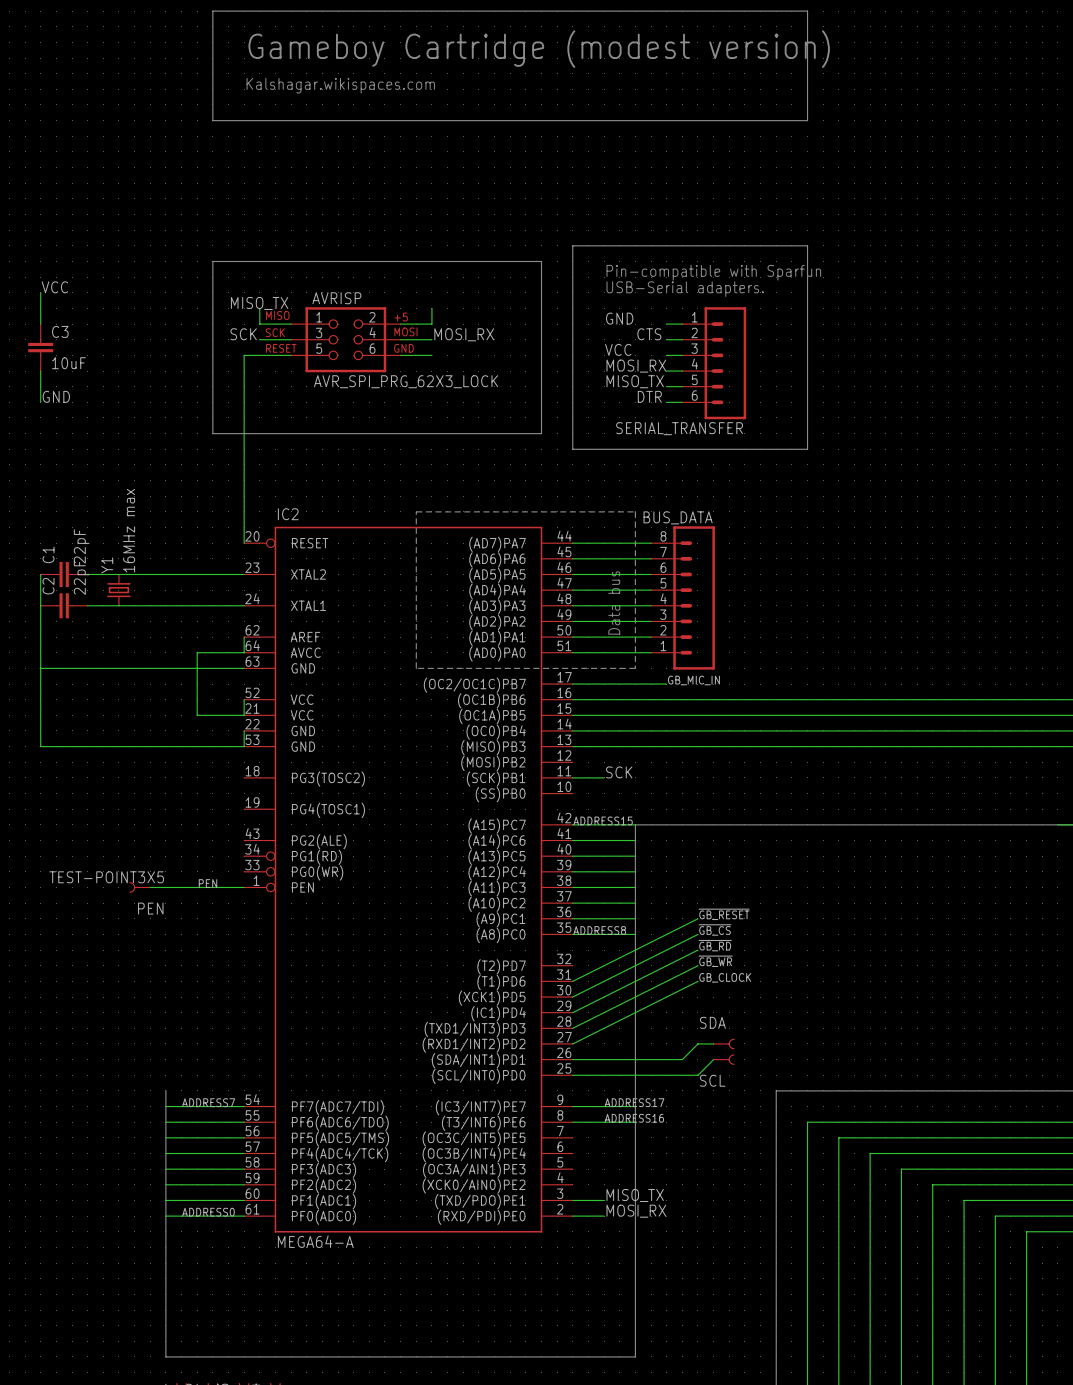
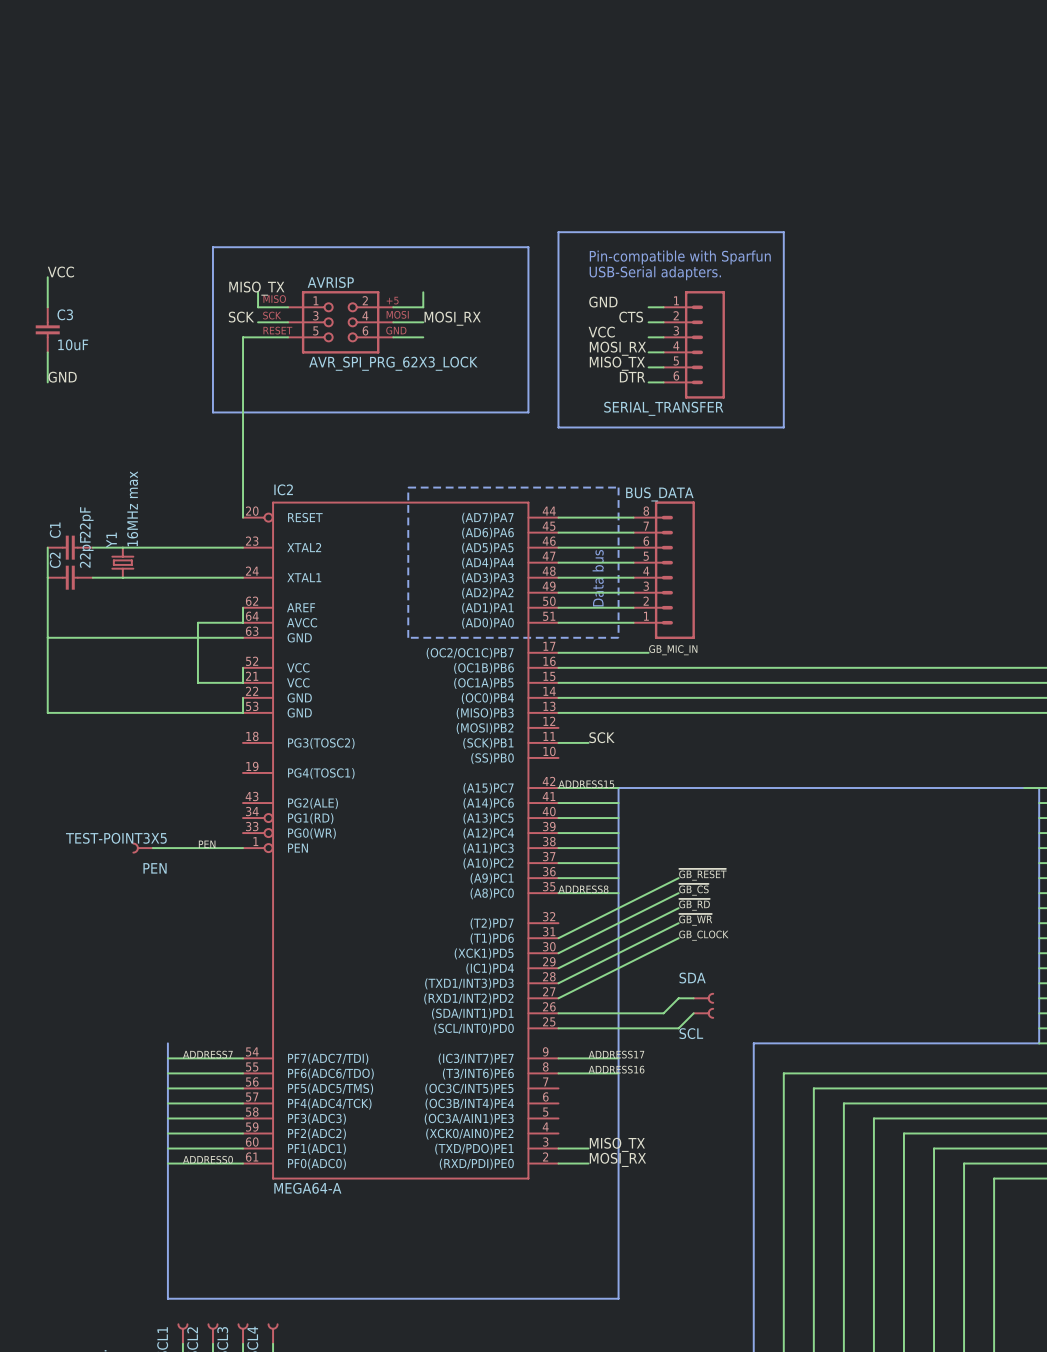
line: (212, 11) (807, 11) (807, 120) (212, 120) (212, 11) -> none
text: Gameboy Cartridge (modest version) (539, 49) -> none
text: Kalshagar.wikispaces.com (340, 85) -> none

